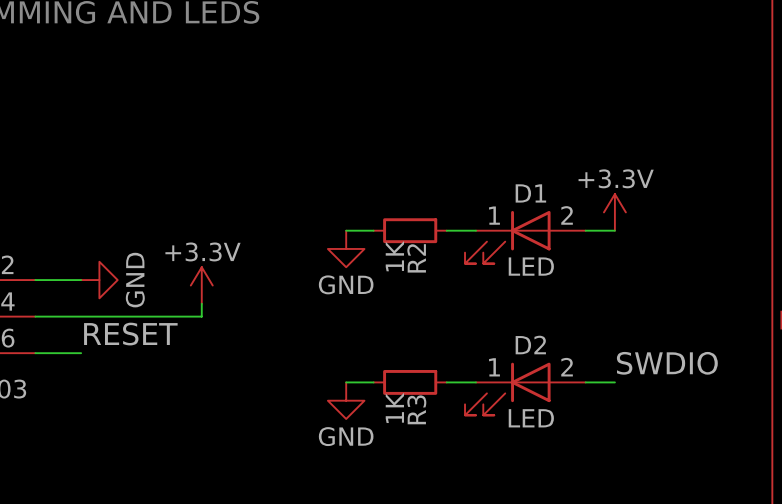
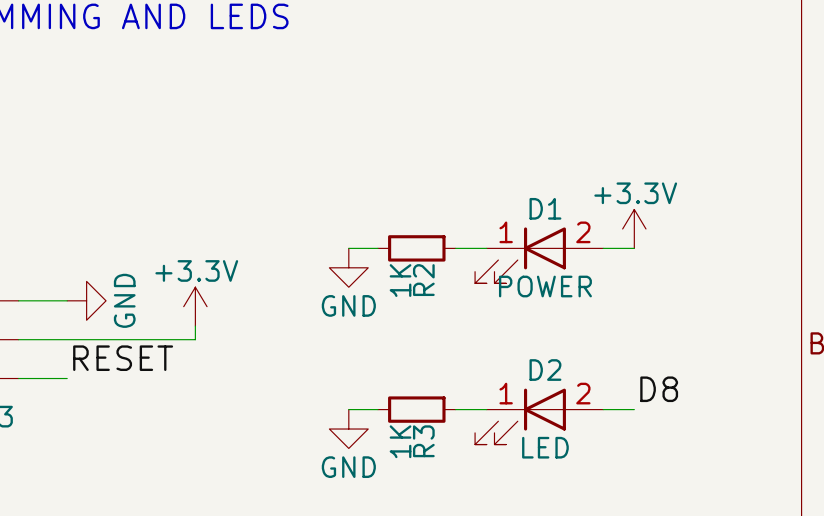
D1 value: LED (531, 266) -> POWER (545, 286)
label: SWDIO (667, 363) -> D8 (659, 389)

